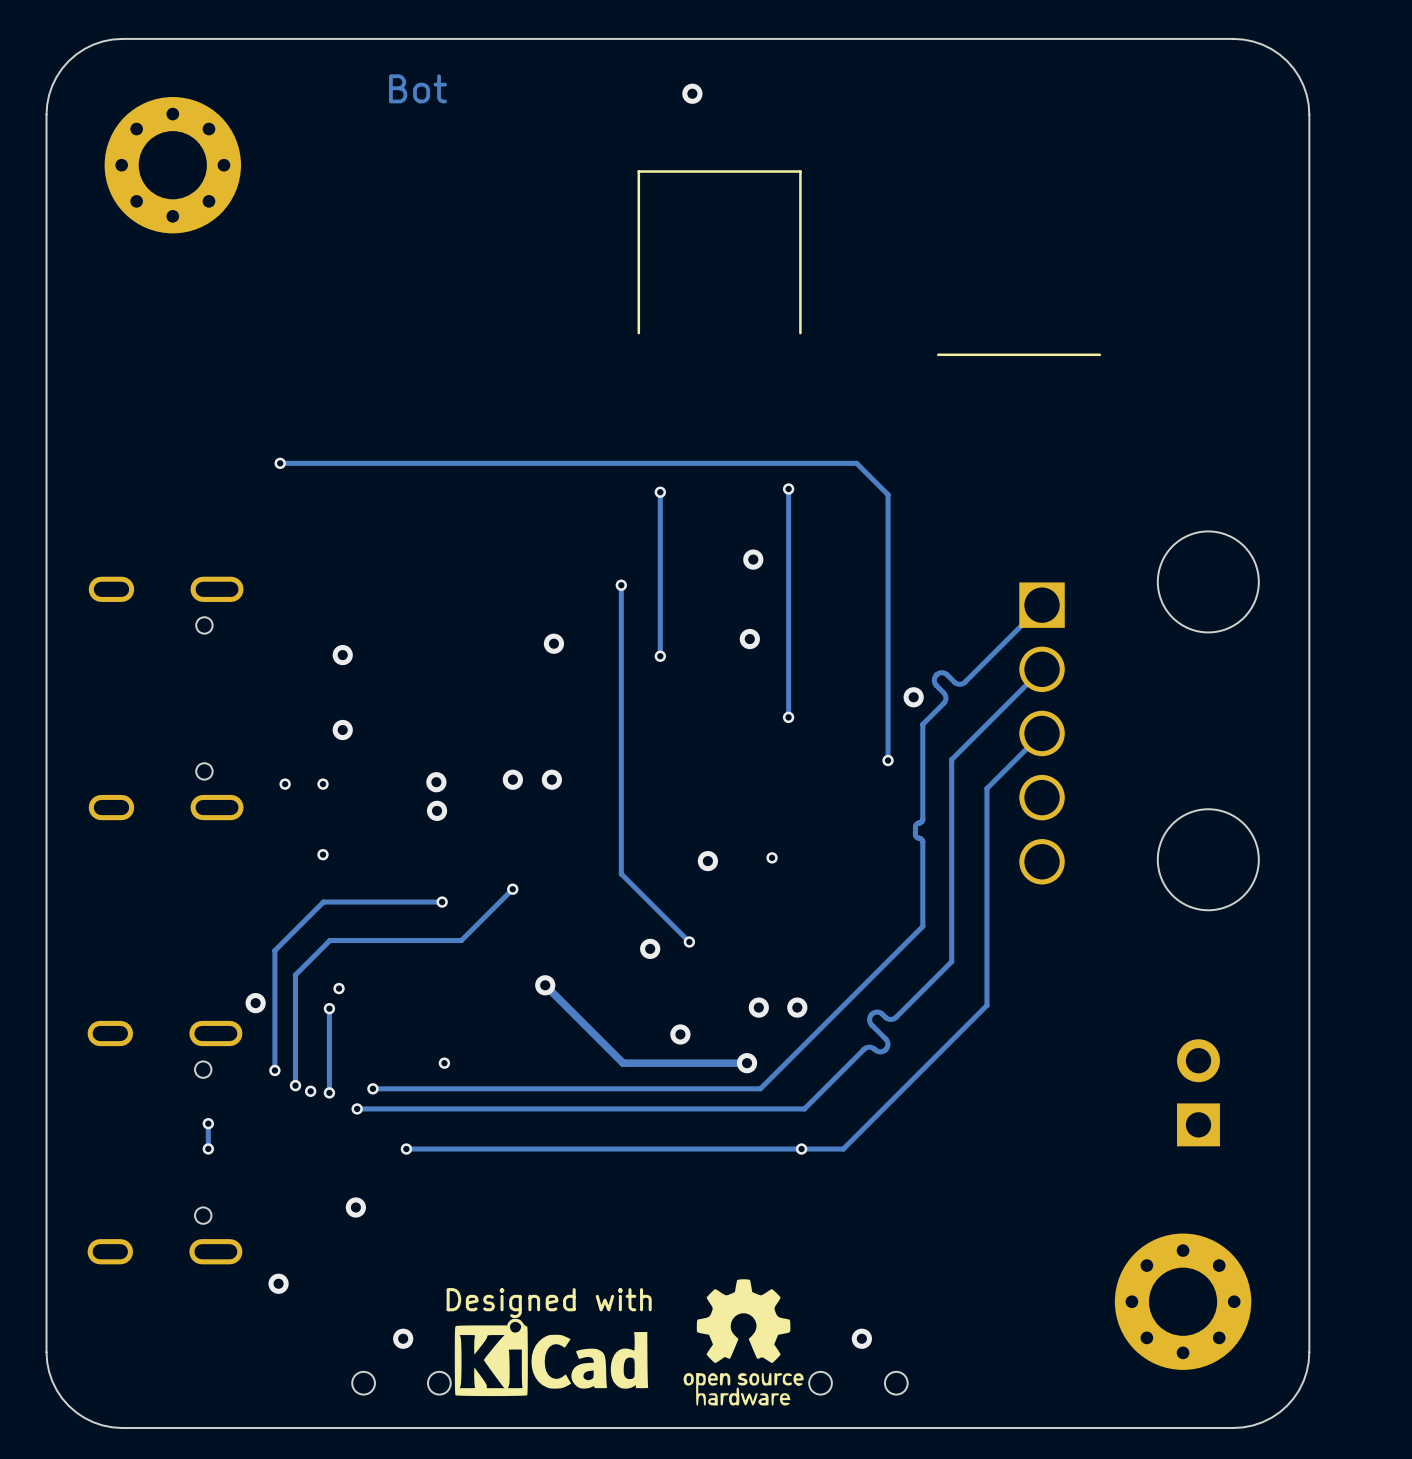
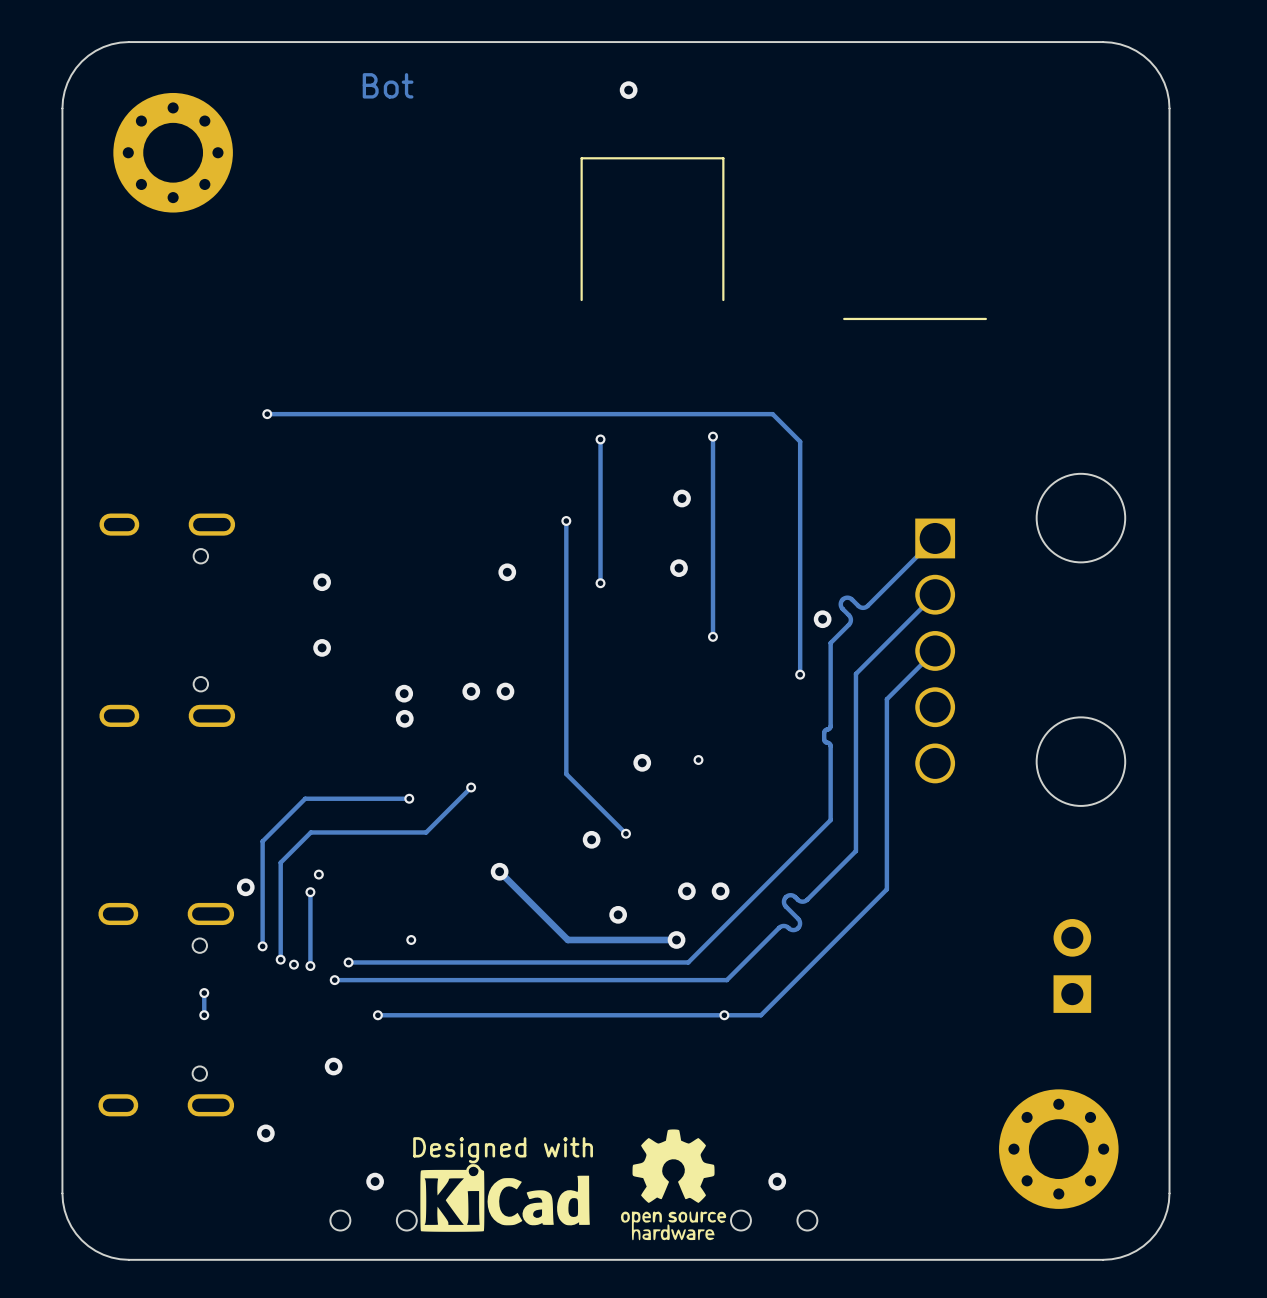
via: (285, 784) -> none
via: (323, 784) -> none
via: (323, 854) -> none

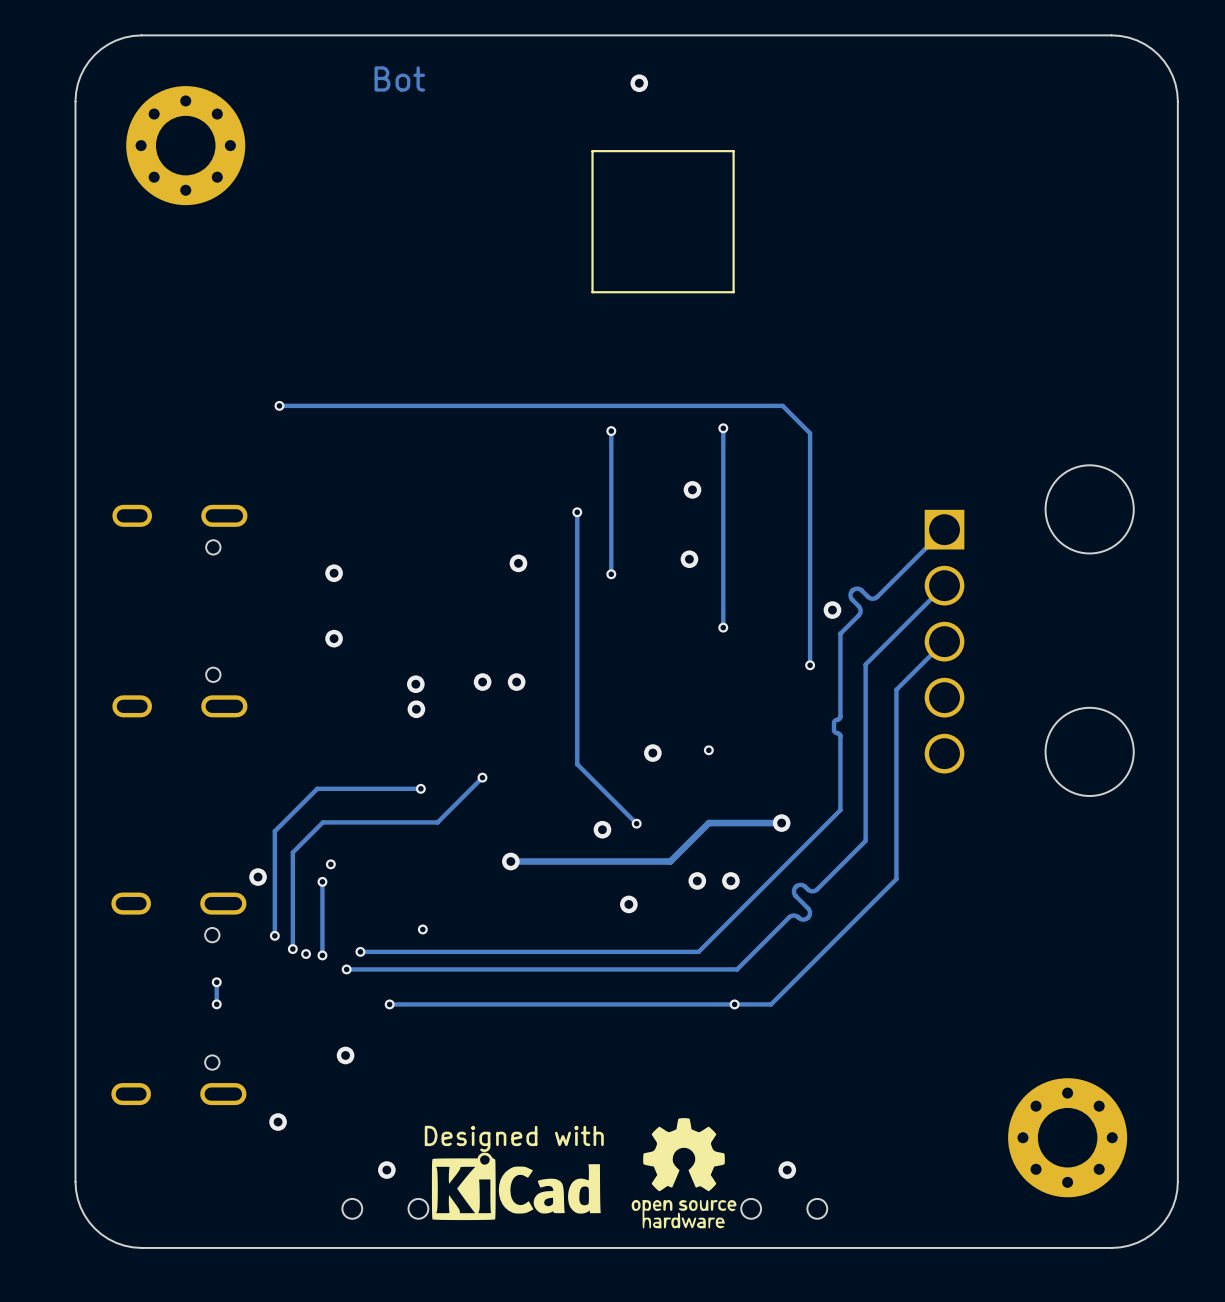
line: (985, 318) (844, 318) -> (733, 292) (592, 292)
via: none -> (781, 823)
track: (499, 871) (567, 939) (676, 939) -> (510, 861) (670, 861) (708, 823) (781, 823)
via: (676, 939) -> none
part: (1072, 965) -> none

